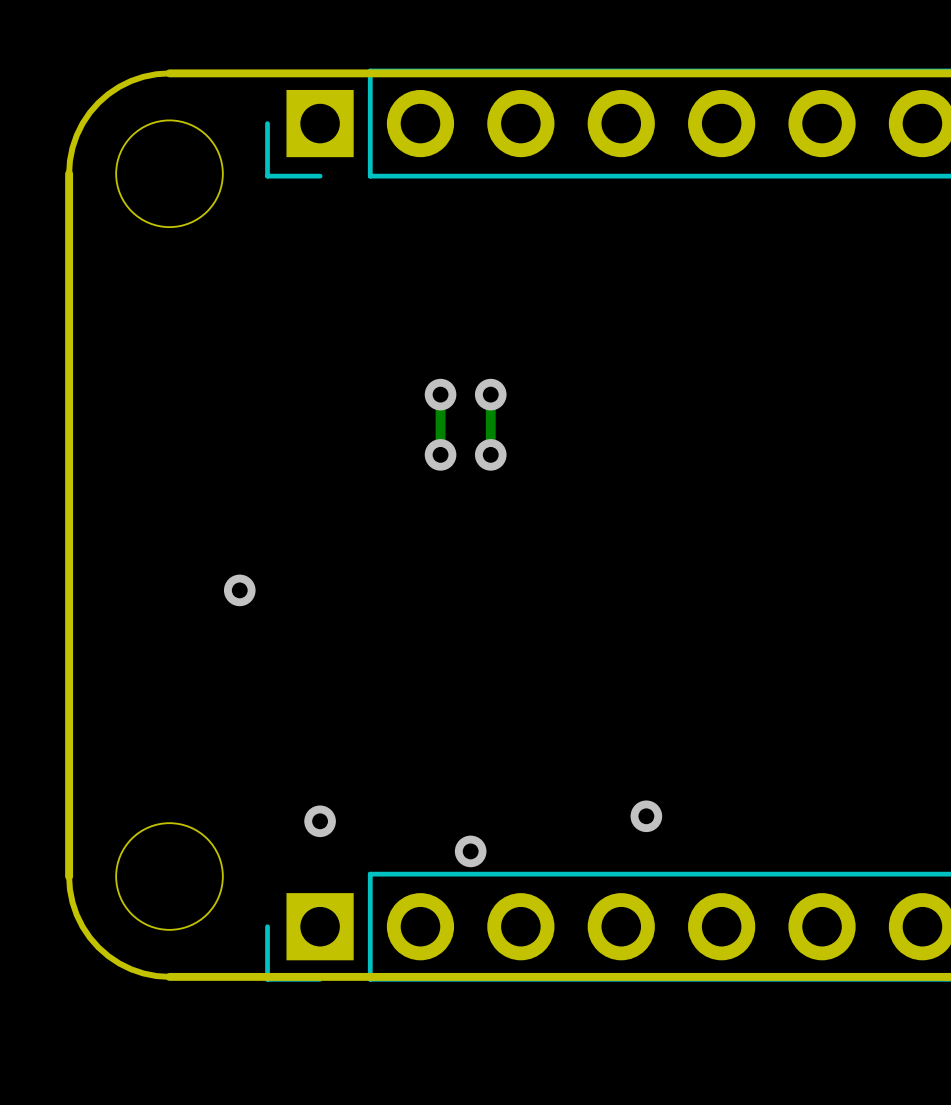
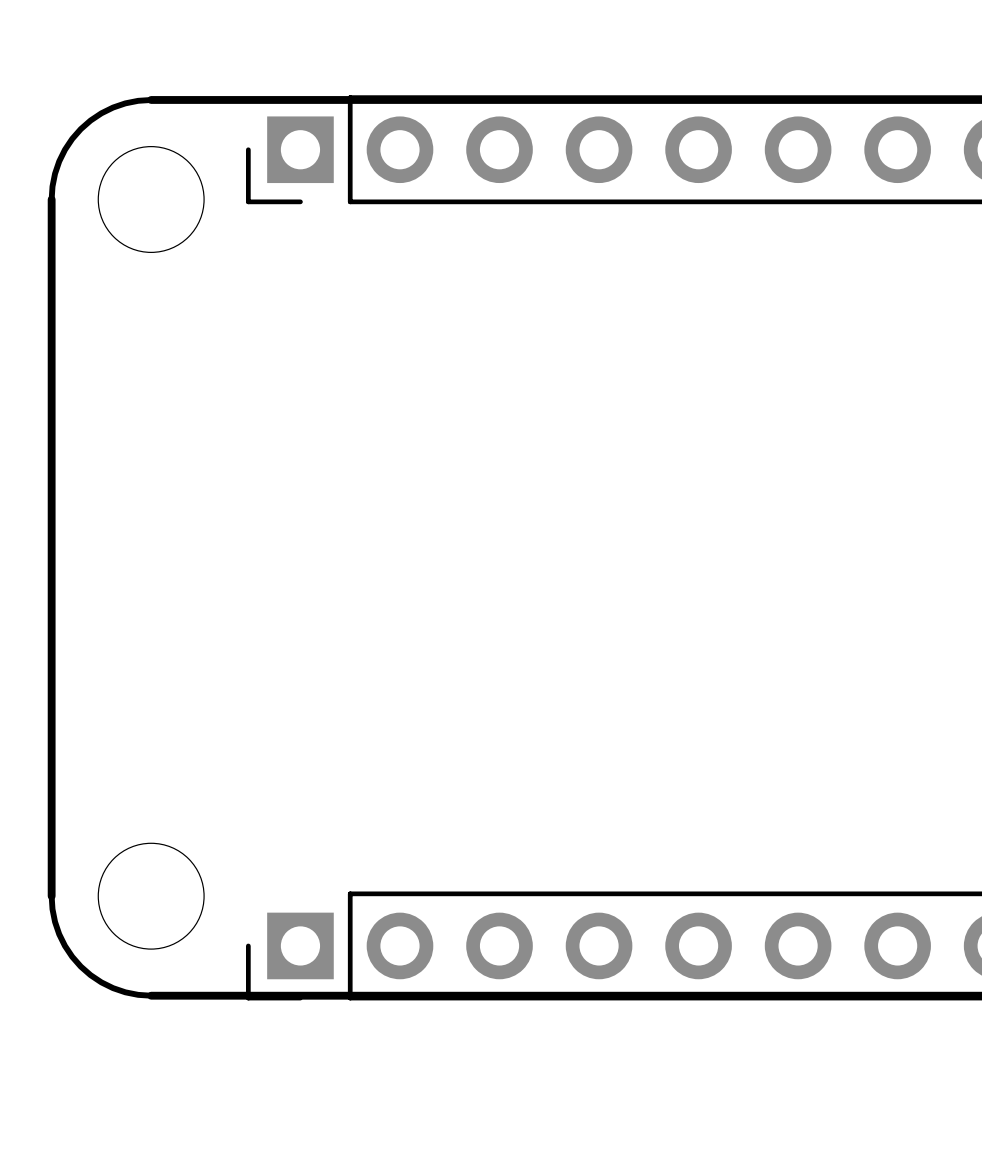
track: (440, 394) (440, 454) -> none
via: (440, 394) -> none
track: (490, 394) (490, 454) -> none
via: (490, 394) -> none
via: (440, 454) -> none
via: (490, 454) -> none
via: (239, 590) -> none
via: (646, 816) -> none
via: (320, 821) -> none
via: (470, 851) -> none

